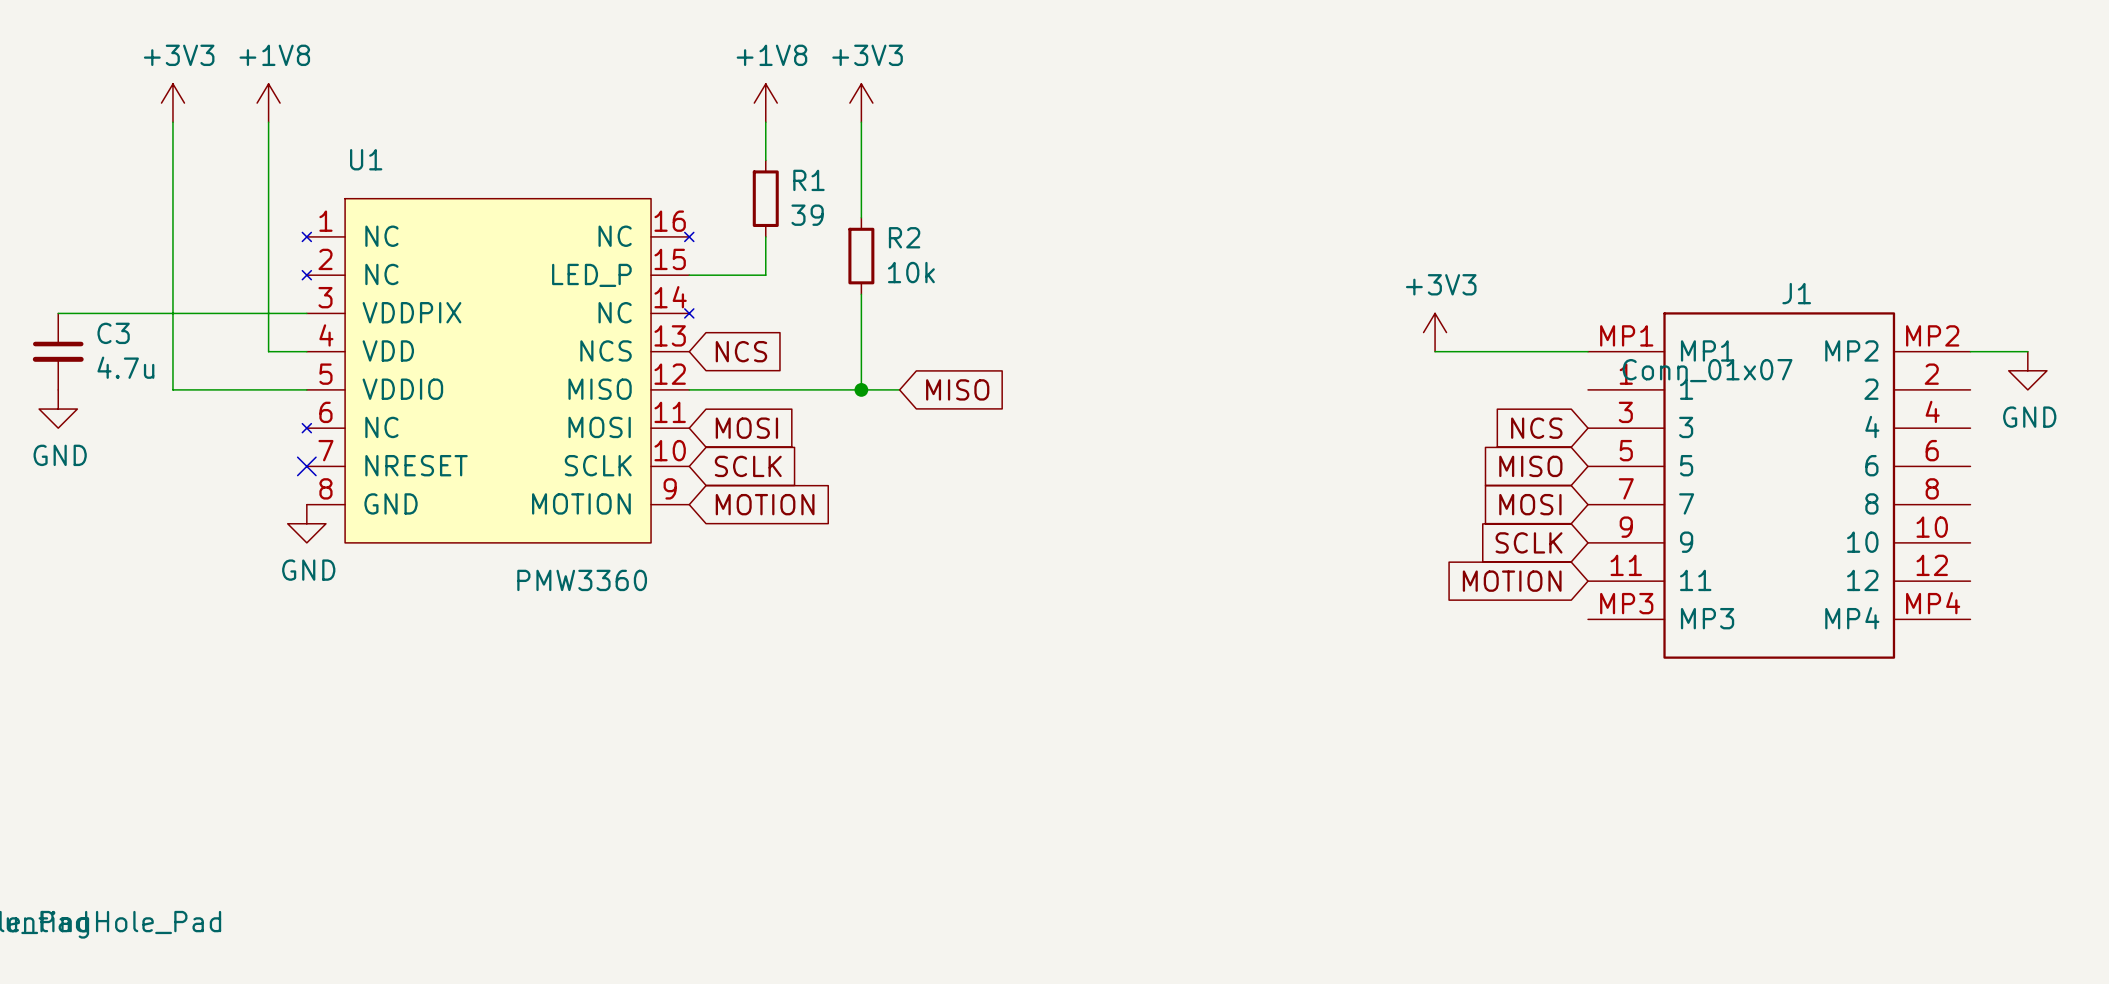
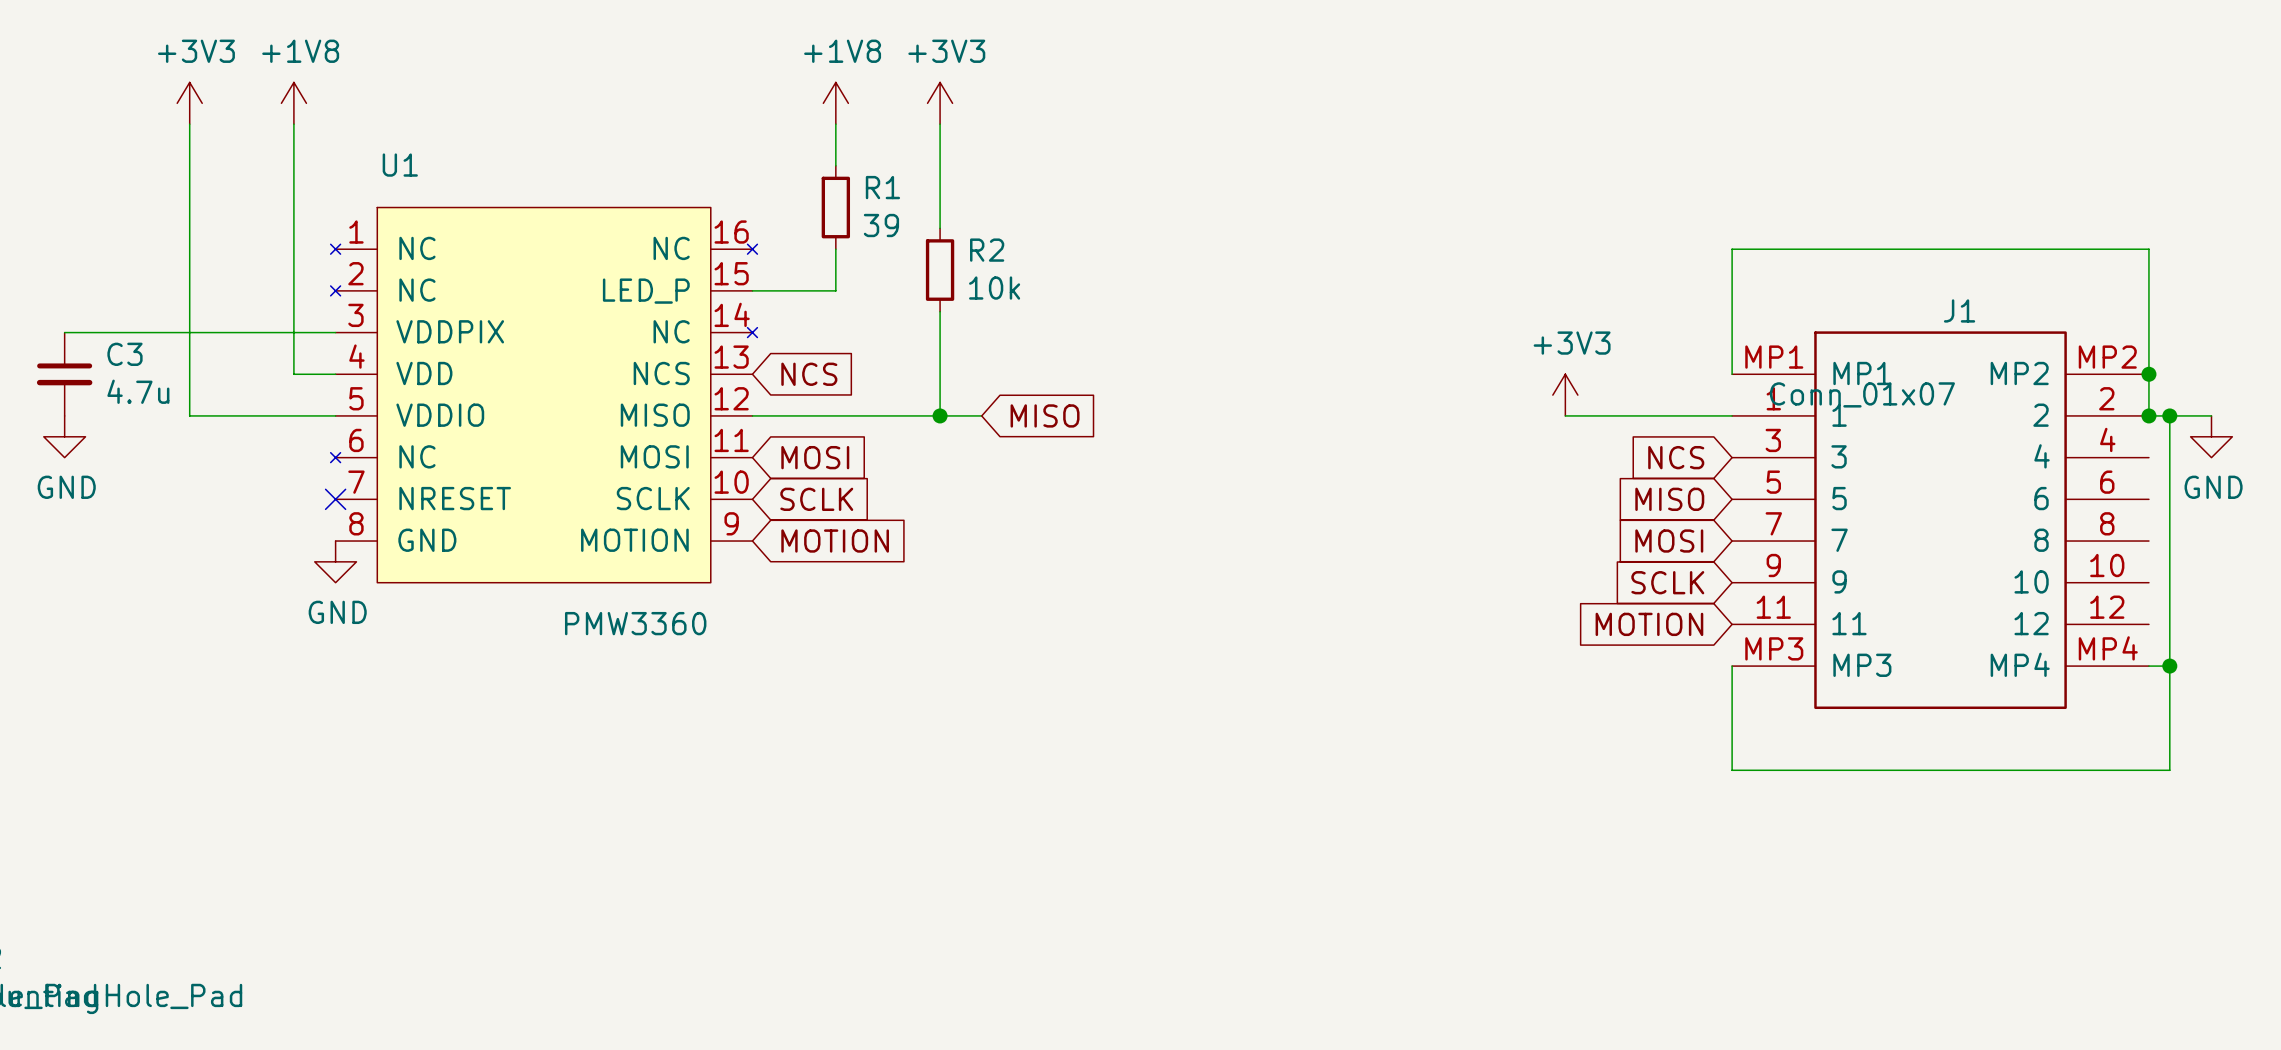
power symbol position: +3V3 (1435, 332) -> +3V3 (1565, 395)
wire: (1435, 351) (1588, 351) -> (2211, 415) (2148, 415) (2148, 249) (1732, 249) (1732, 374)
wire: (1970, 351) (2027, 351) -> none
junction: none -> (2148, 374)
power symbol position: GND (2027, 370) -> GND (2211, 436)
wire: none -> (1565, 415) (1732, 415)
junction: none -> (2148, 415)
wire: none -> (2169, 415) (2169, 770) (1732, 770) (1732, 666)
junction: none -> (2169, 415)
wire: none -> (2148, 666) (2169, 666)
junction: none -> (2169, 666)

